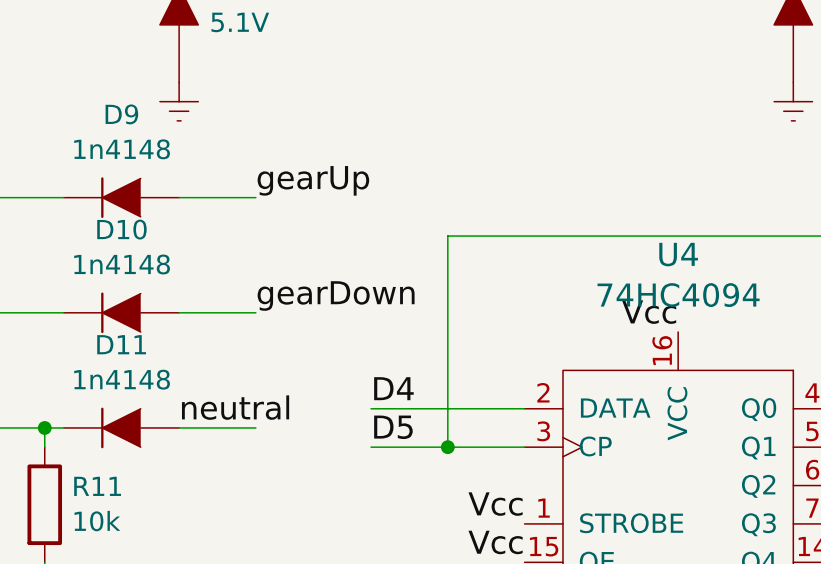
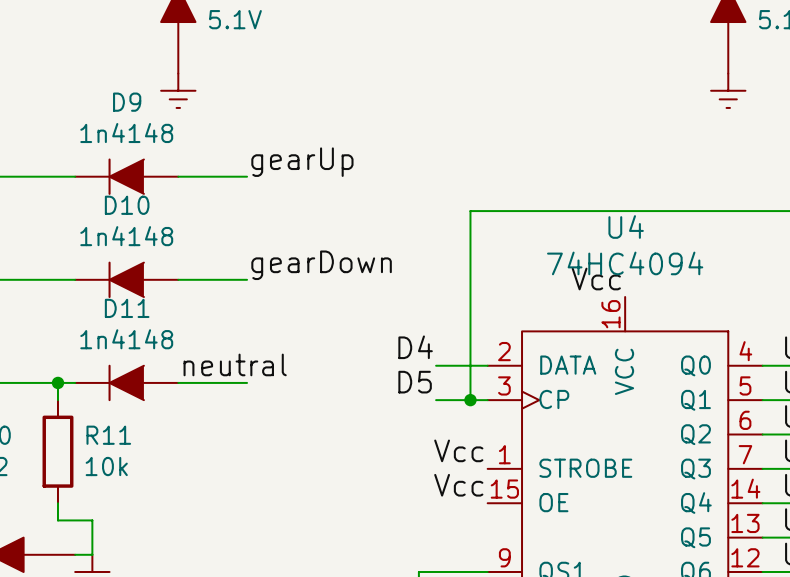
wire: (505, 236) (447, 236) (447, 447) -> (470, 211) (470, 400)
label position: D4 (393, 388) -> D4 (415, 347)
wire: (371, 408) (467, 408) -> none
label position: D5 (393, 427) -> D5 (415, 382)
wire: (371, 447) (467, 447) -> none
junction position: (447, 447) -> (470, 400)

